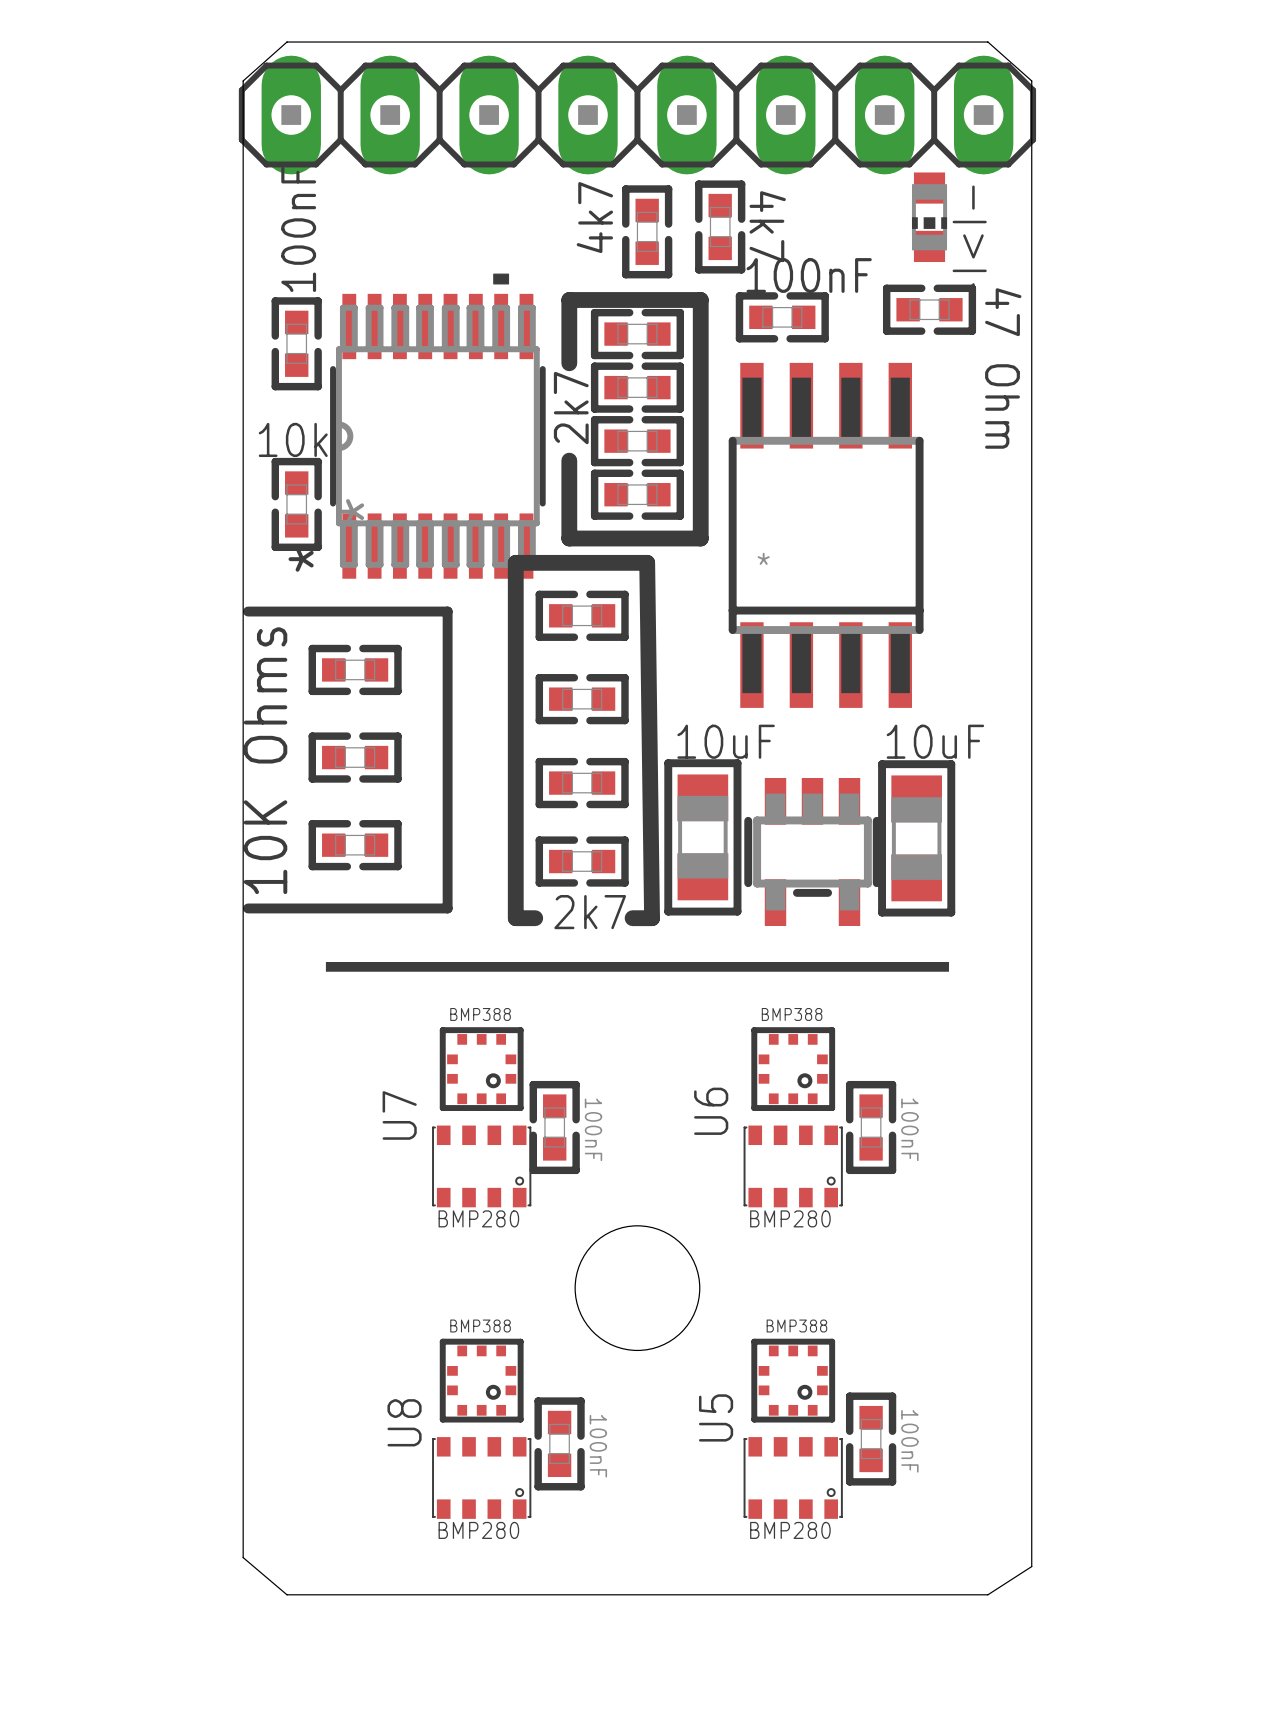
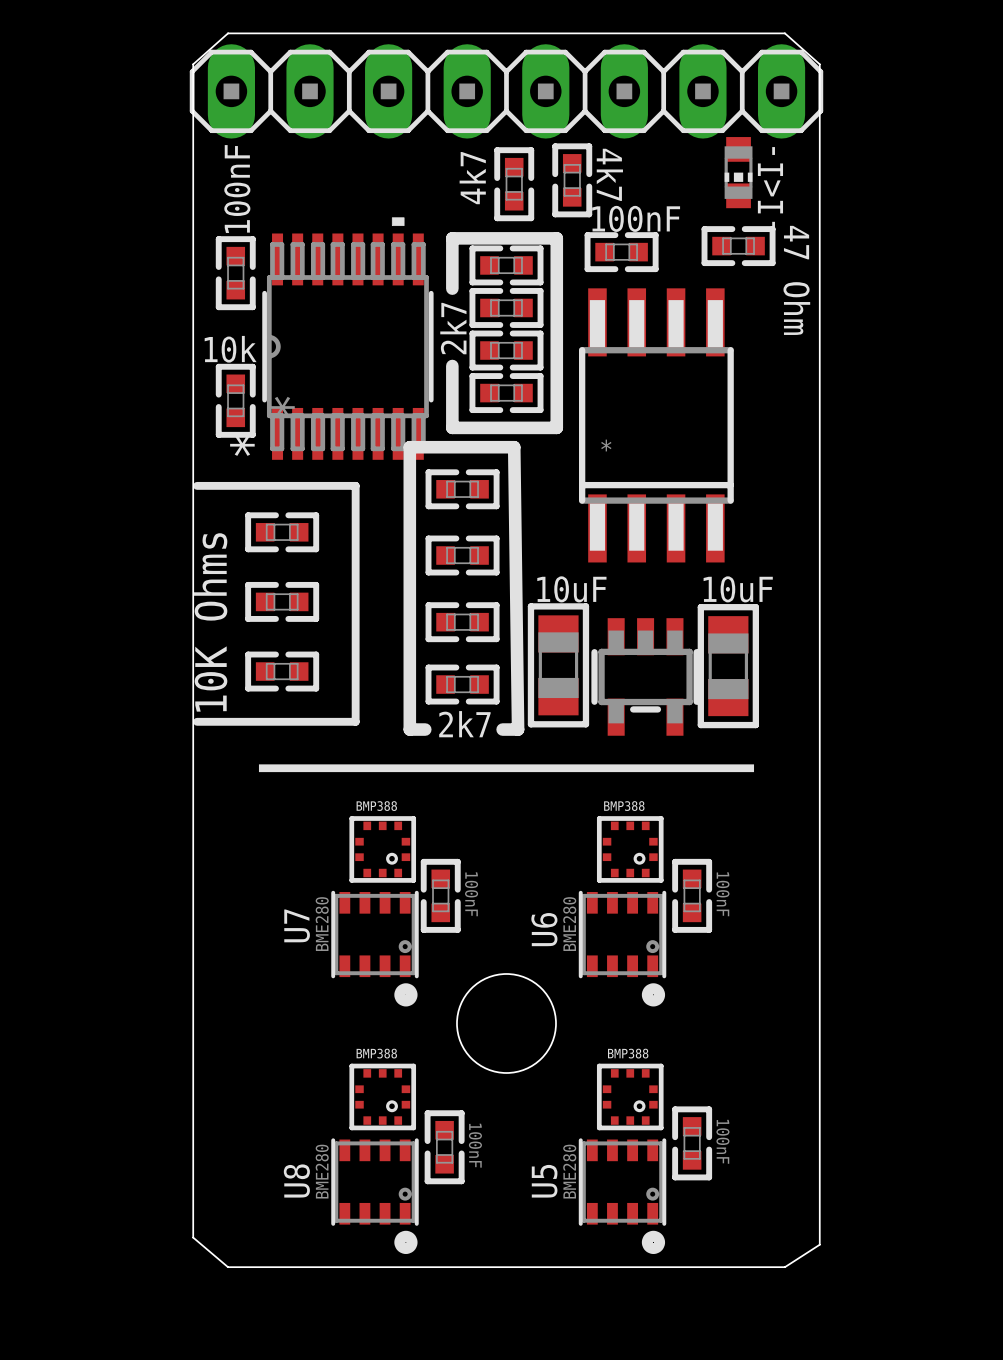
U7 footprint: [432, 1125, 532, 1208] -> [331, 890, 419, 1007]
U6 footprint: [743, 1125, 843, 1208] -> [578, 890, 667, 1007]
U7 value: BMP280 (478, 1218) -> BME280 (322, 924)
U6 value: BMP280 (790, 1218) -> BME280 (569, 924)
U8 footprint: [432, 1437, 532, 1519] -> [331, 1138, 419, 1255]
U5 footprint: [743, 1437, 843, 1519] -> [578, 1138, 667, 1255]
U8 value: BMP280 (478, 1530) -> BME280 (322, 1171)
U5 value: BMP280 (790, 1530) -> BME280 (569, 1171)

